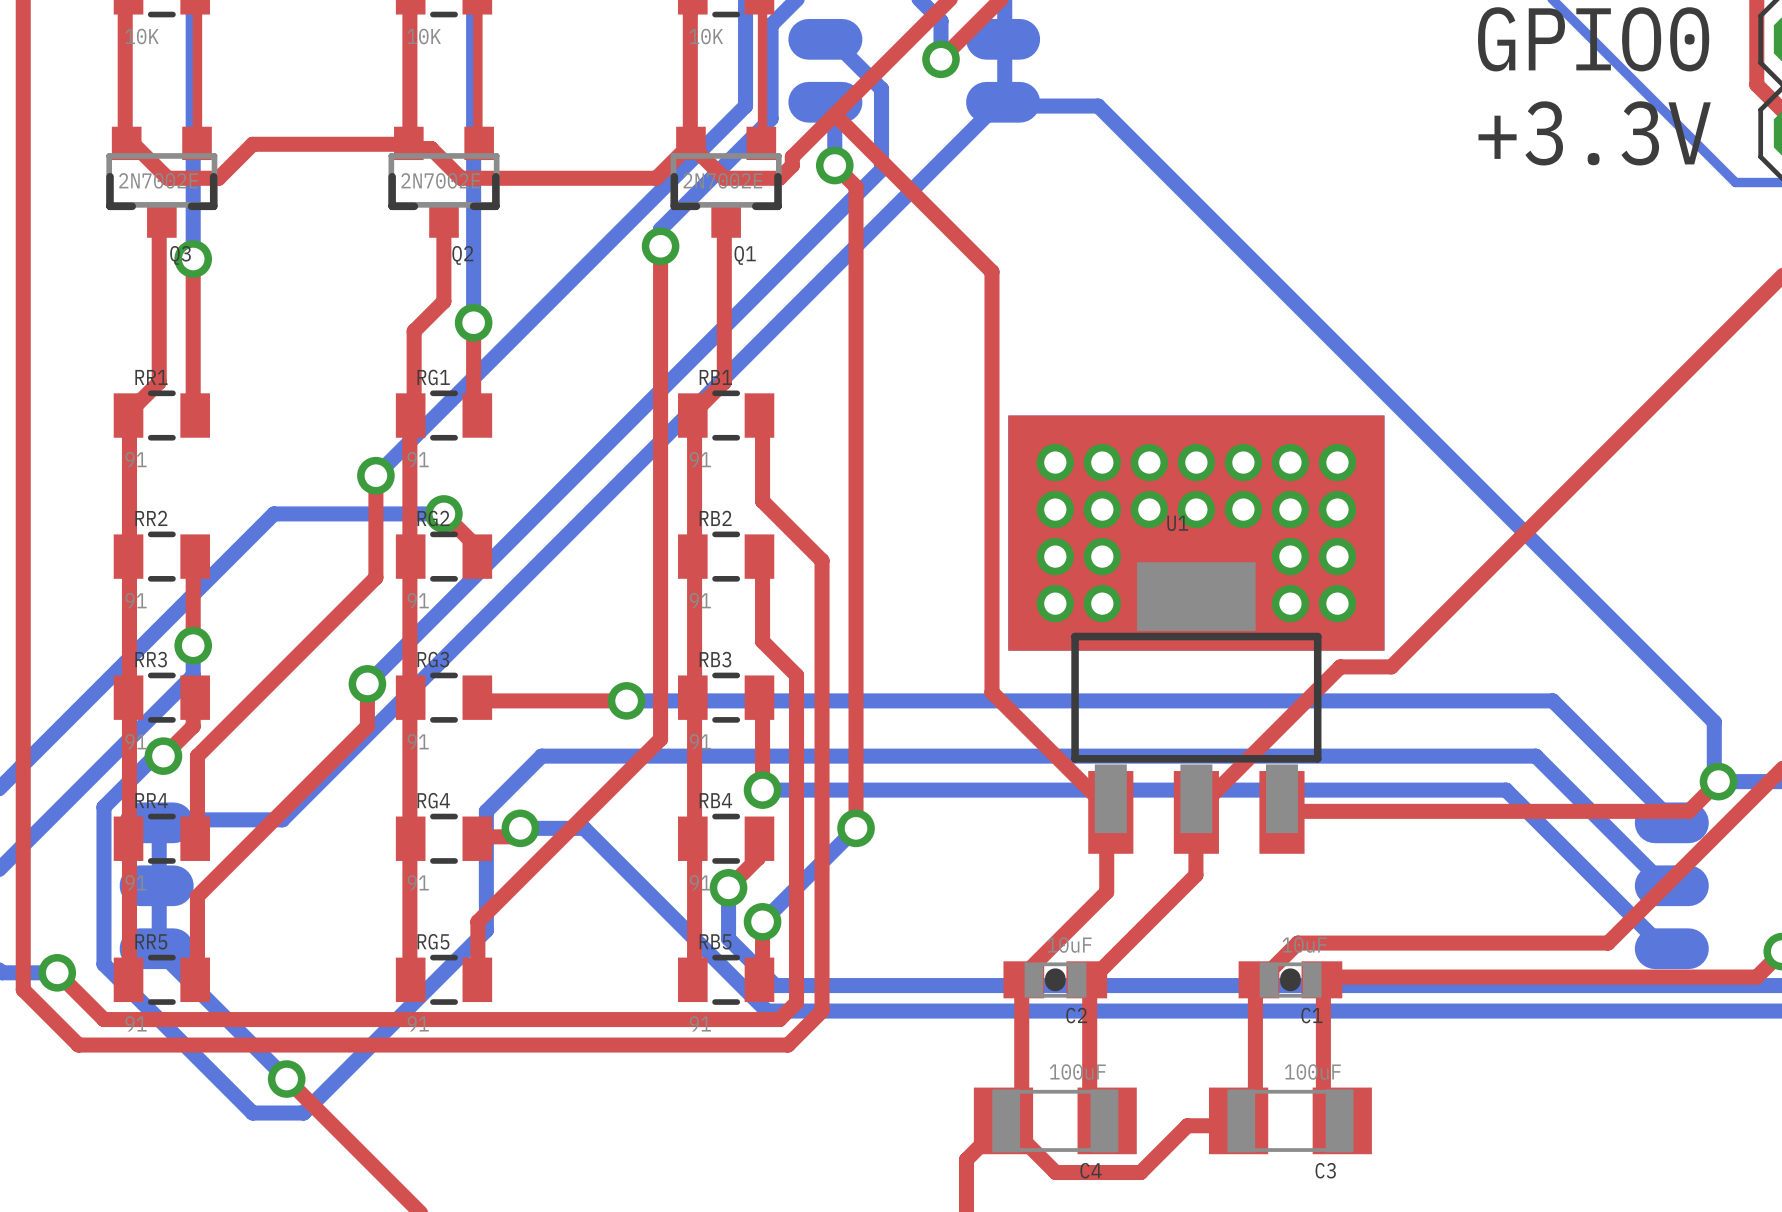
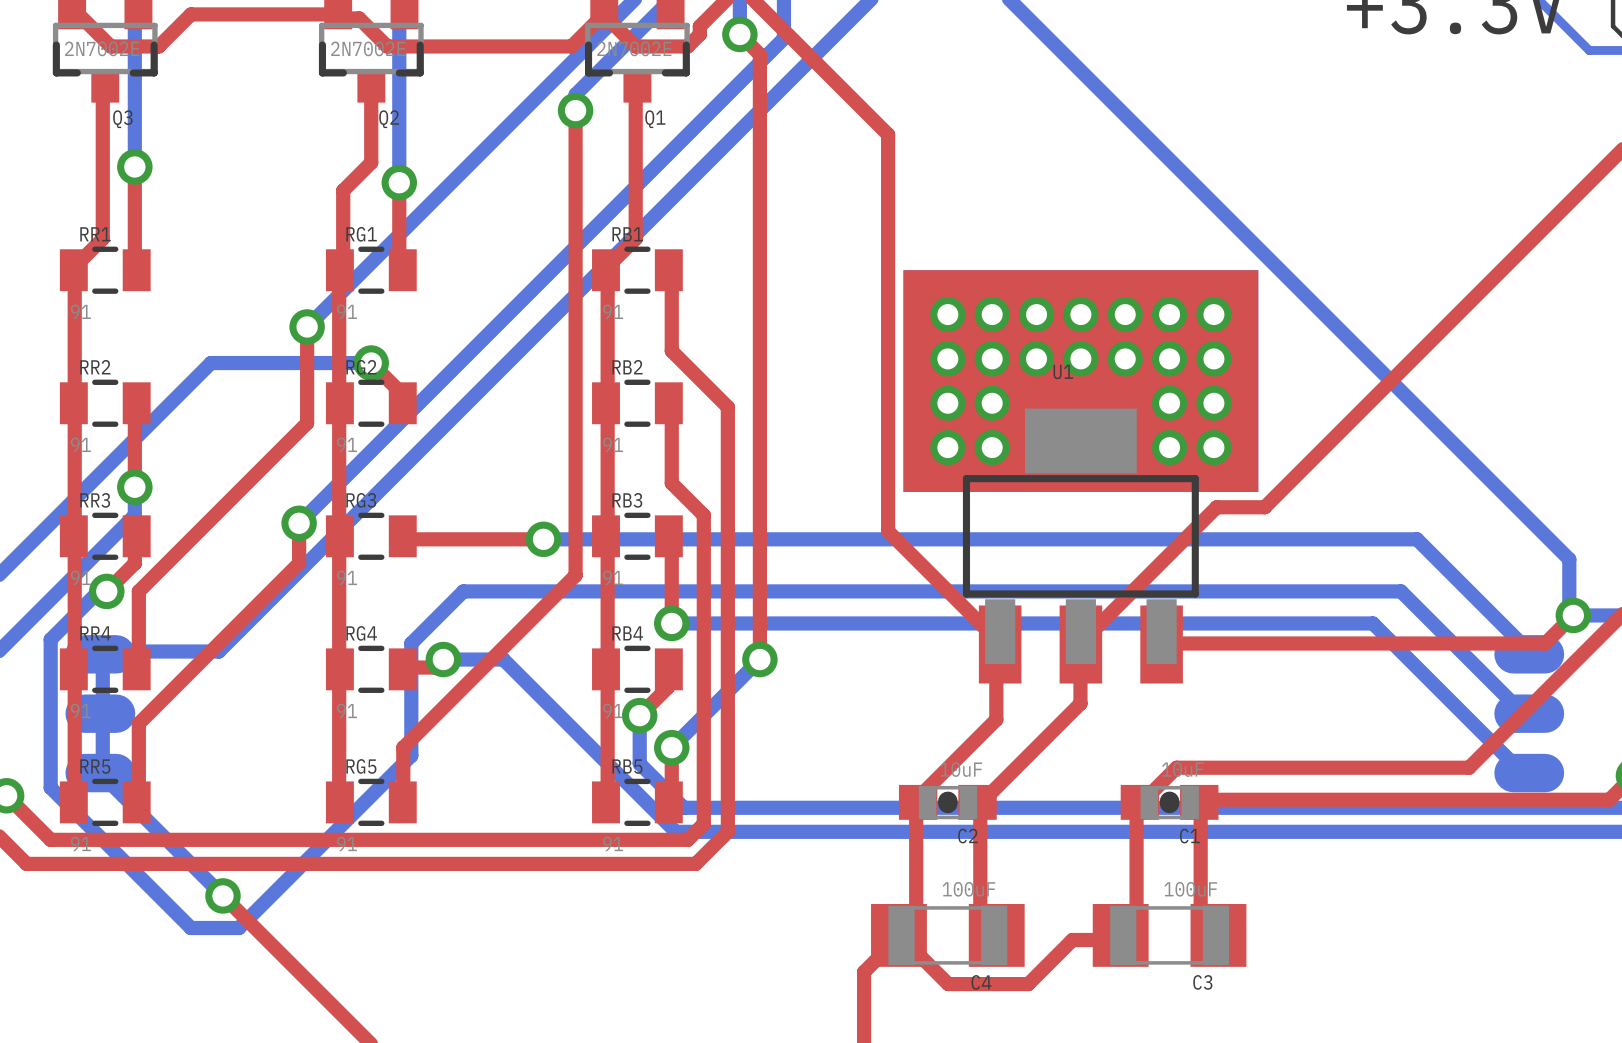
top track: (193, 259) (193, 306) -> none
bottom track: none -> (134, 122) (134, 166)
via position: (193, 259) -> (134, 166)

